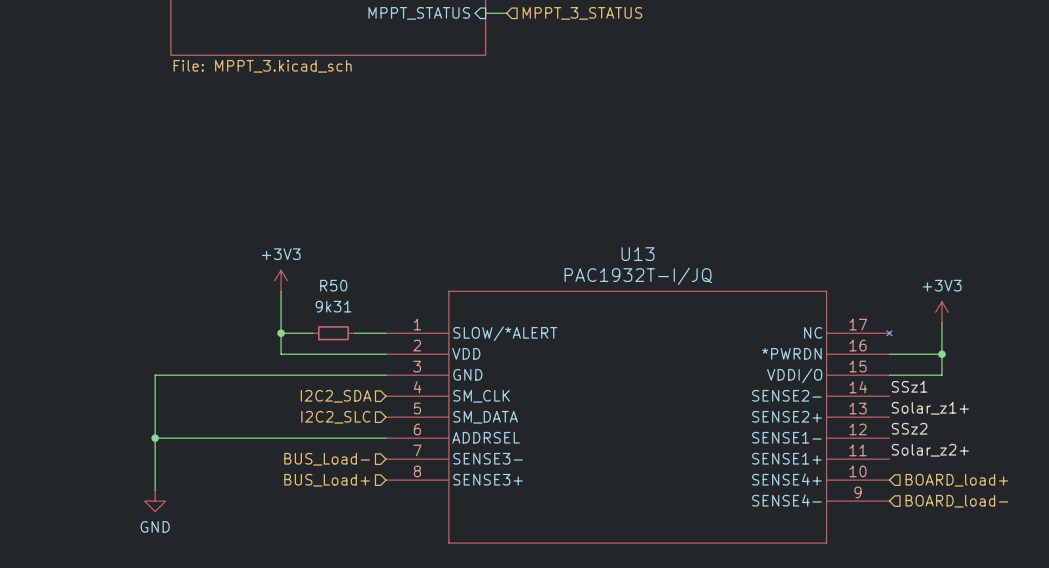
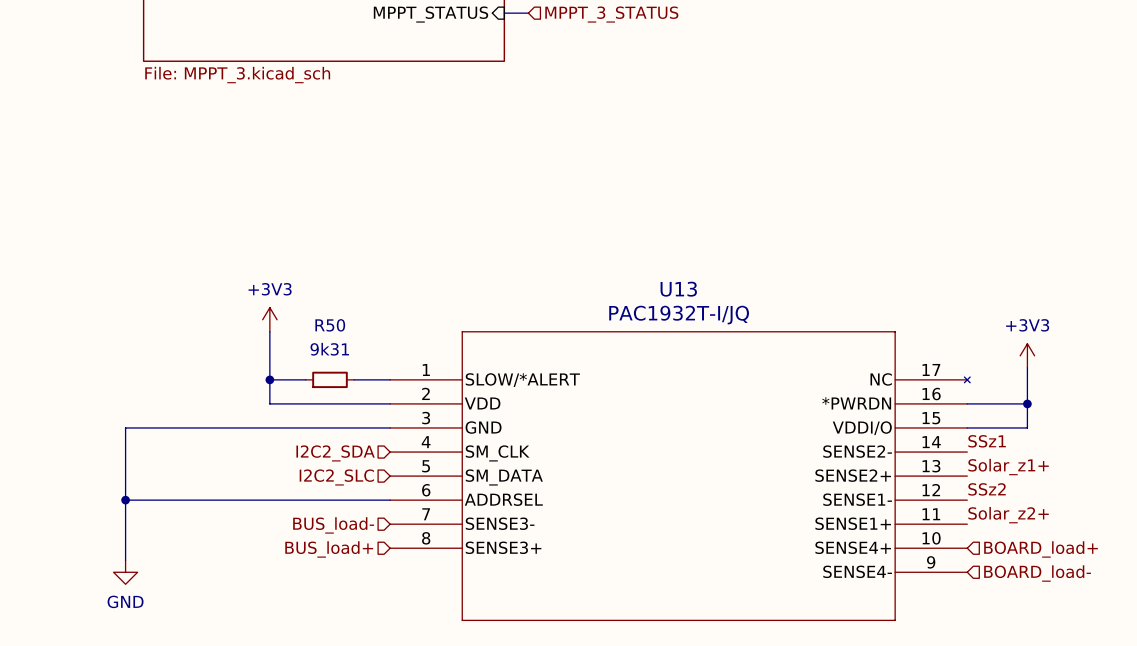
hierarchical label: BUS_Load- (327, 459) -> BUS_load- (333, 525)
hierarchical label: BUS_Load+ (327, 480) -> BUS_load+ (329, 549)

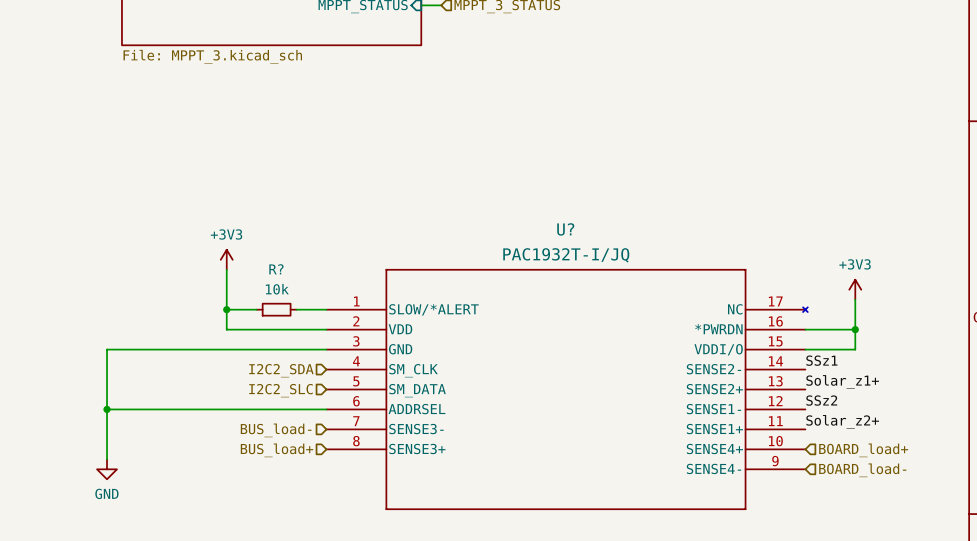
U13 name: U13 (678, 289) -> U? (565, 229)
R50 name: R50 (330, 325) -> R? (276, 269)
R50 value: 9k31 (329, 349) -> 10k (277, 289)

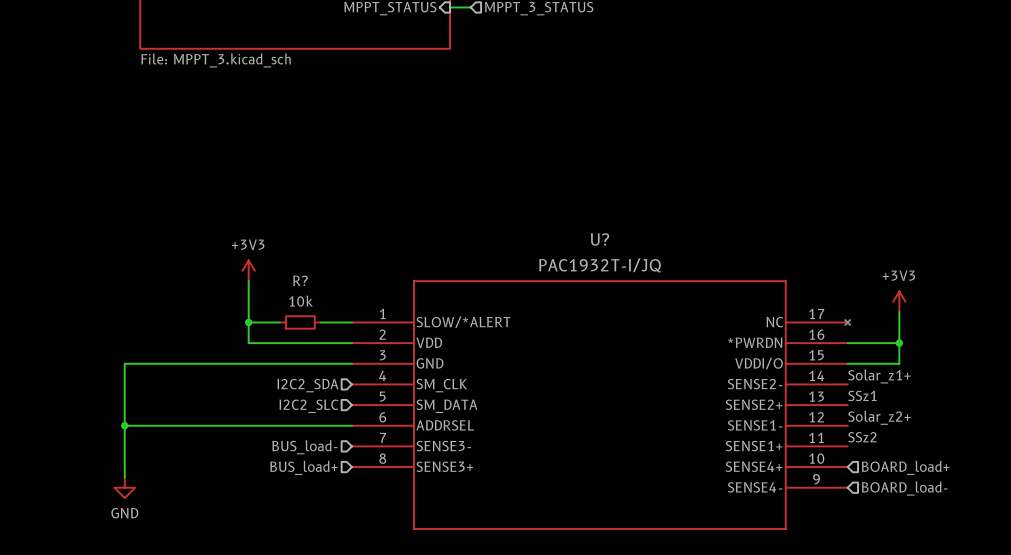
label: SSz1 (821, 360) -> Solar_z1+ (879, 376)
label: Solar_z1+ (842, 381) -> SSz1 (862, 395)
label: SSz2 (821, 400) -> Solar_z2+ (879, 417)
label: Solar_z2+ (842, 421) -> SSz2 (862, 437)

